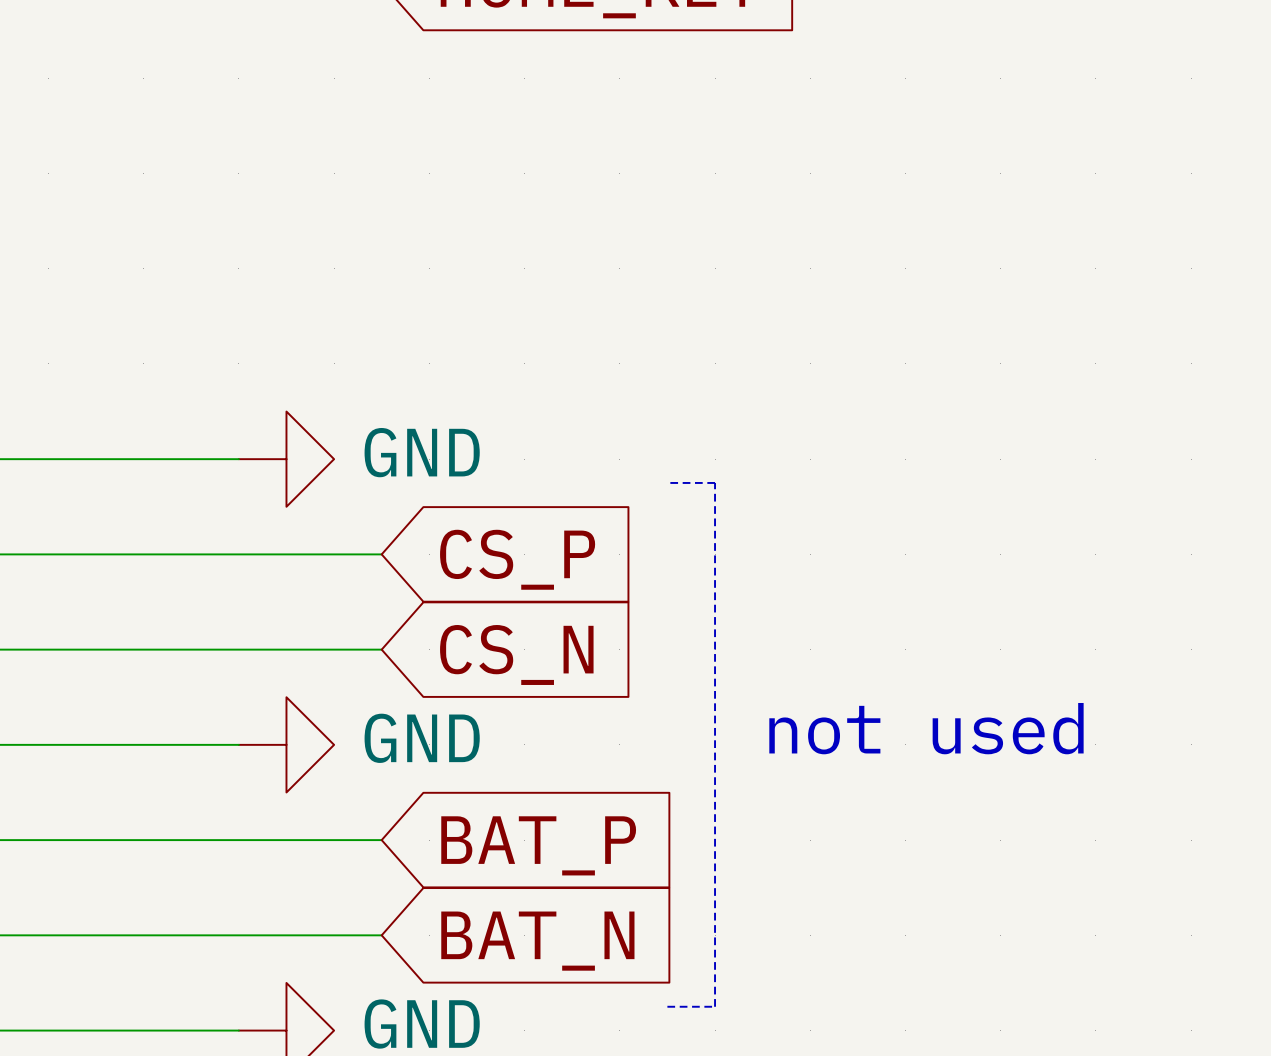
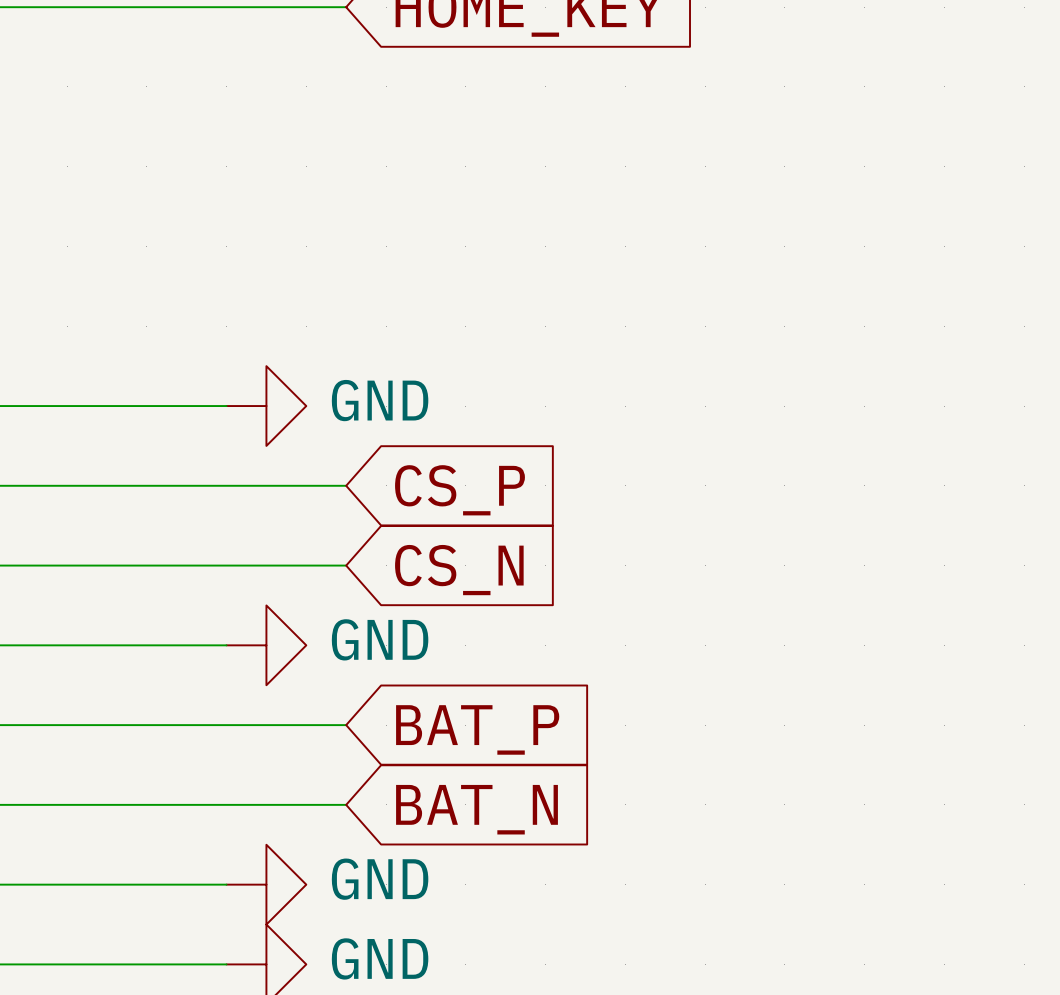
line: (667, 482) (715, 482) (715, 1006) (667, 1006) -> none
text: not used (926, 728) -> none

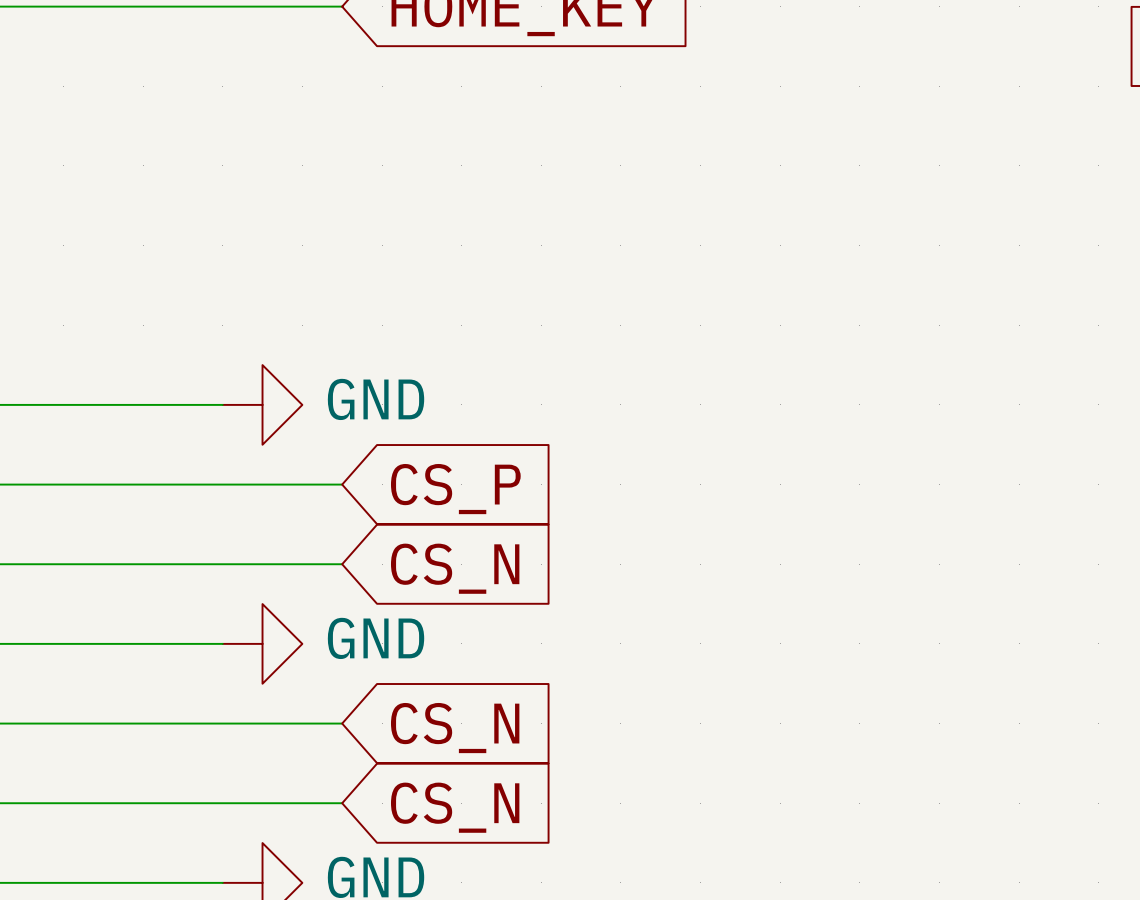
global label: BAT_P (477, 729) -> CS_N (455, 728)
global label: BAT_N (477, 809) -> CS_N (455, 807)

